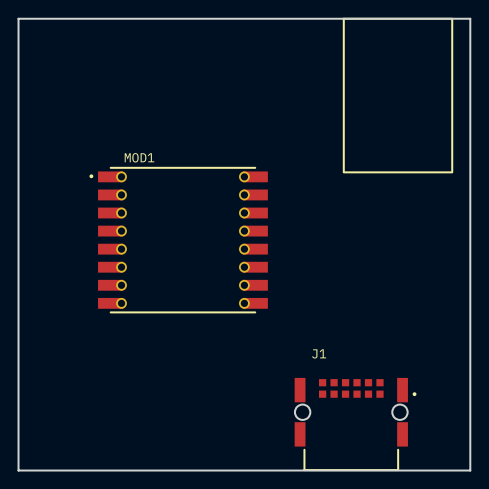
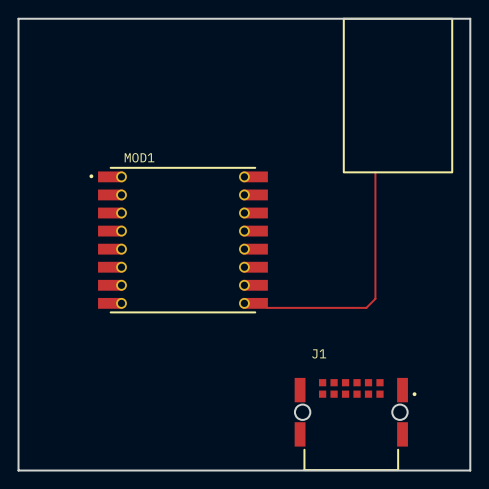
top track: none -> (375, 172) (375, 298) (366, 307) (266, 307)

